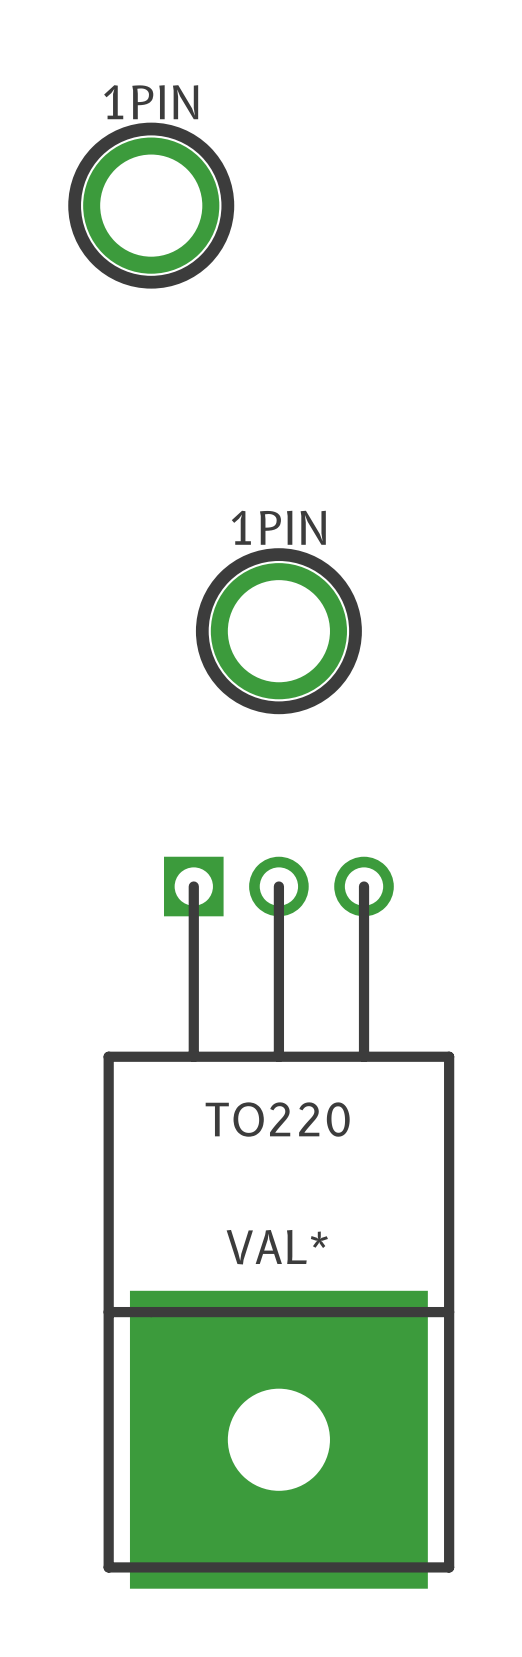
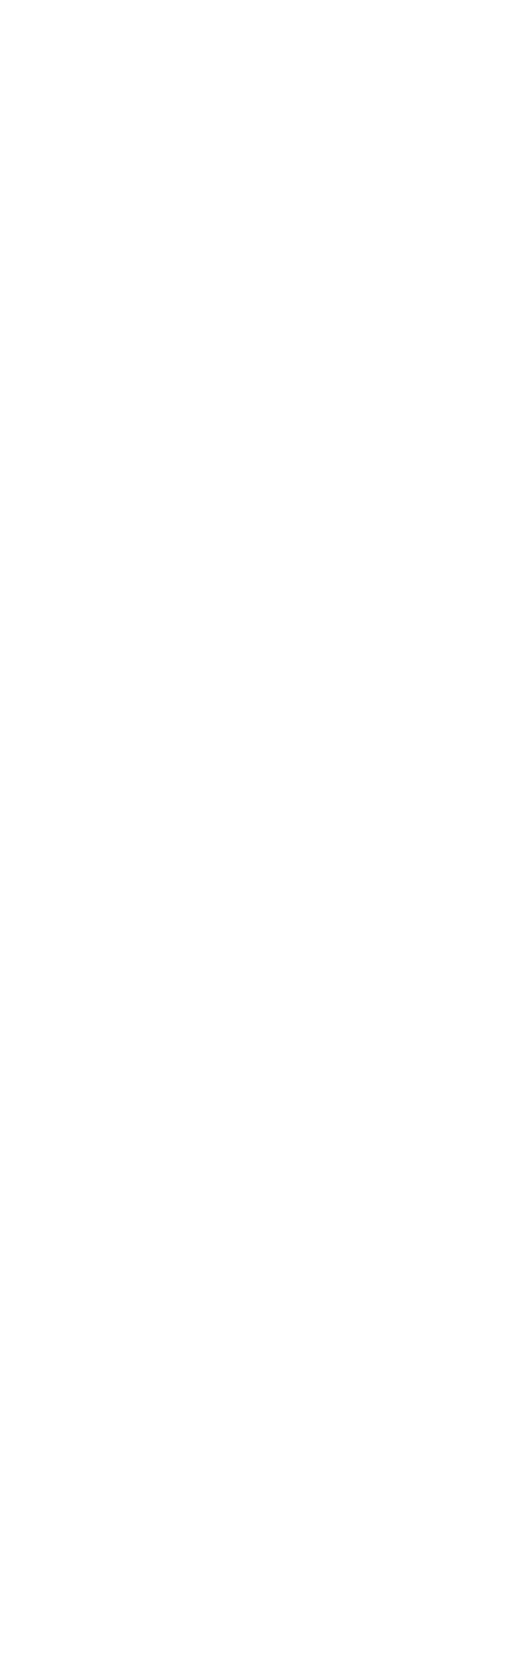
1PIN: (151, 205) -> none
1PIN: (278, 631) -> none
TO220: VAL* (278, 1222) -> none

